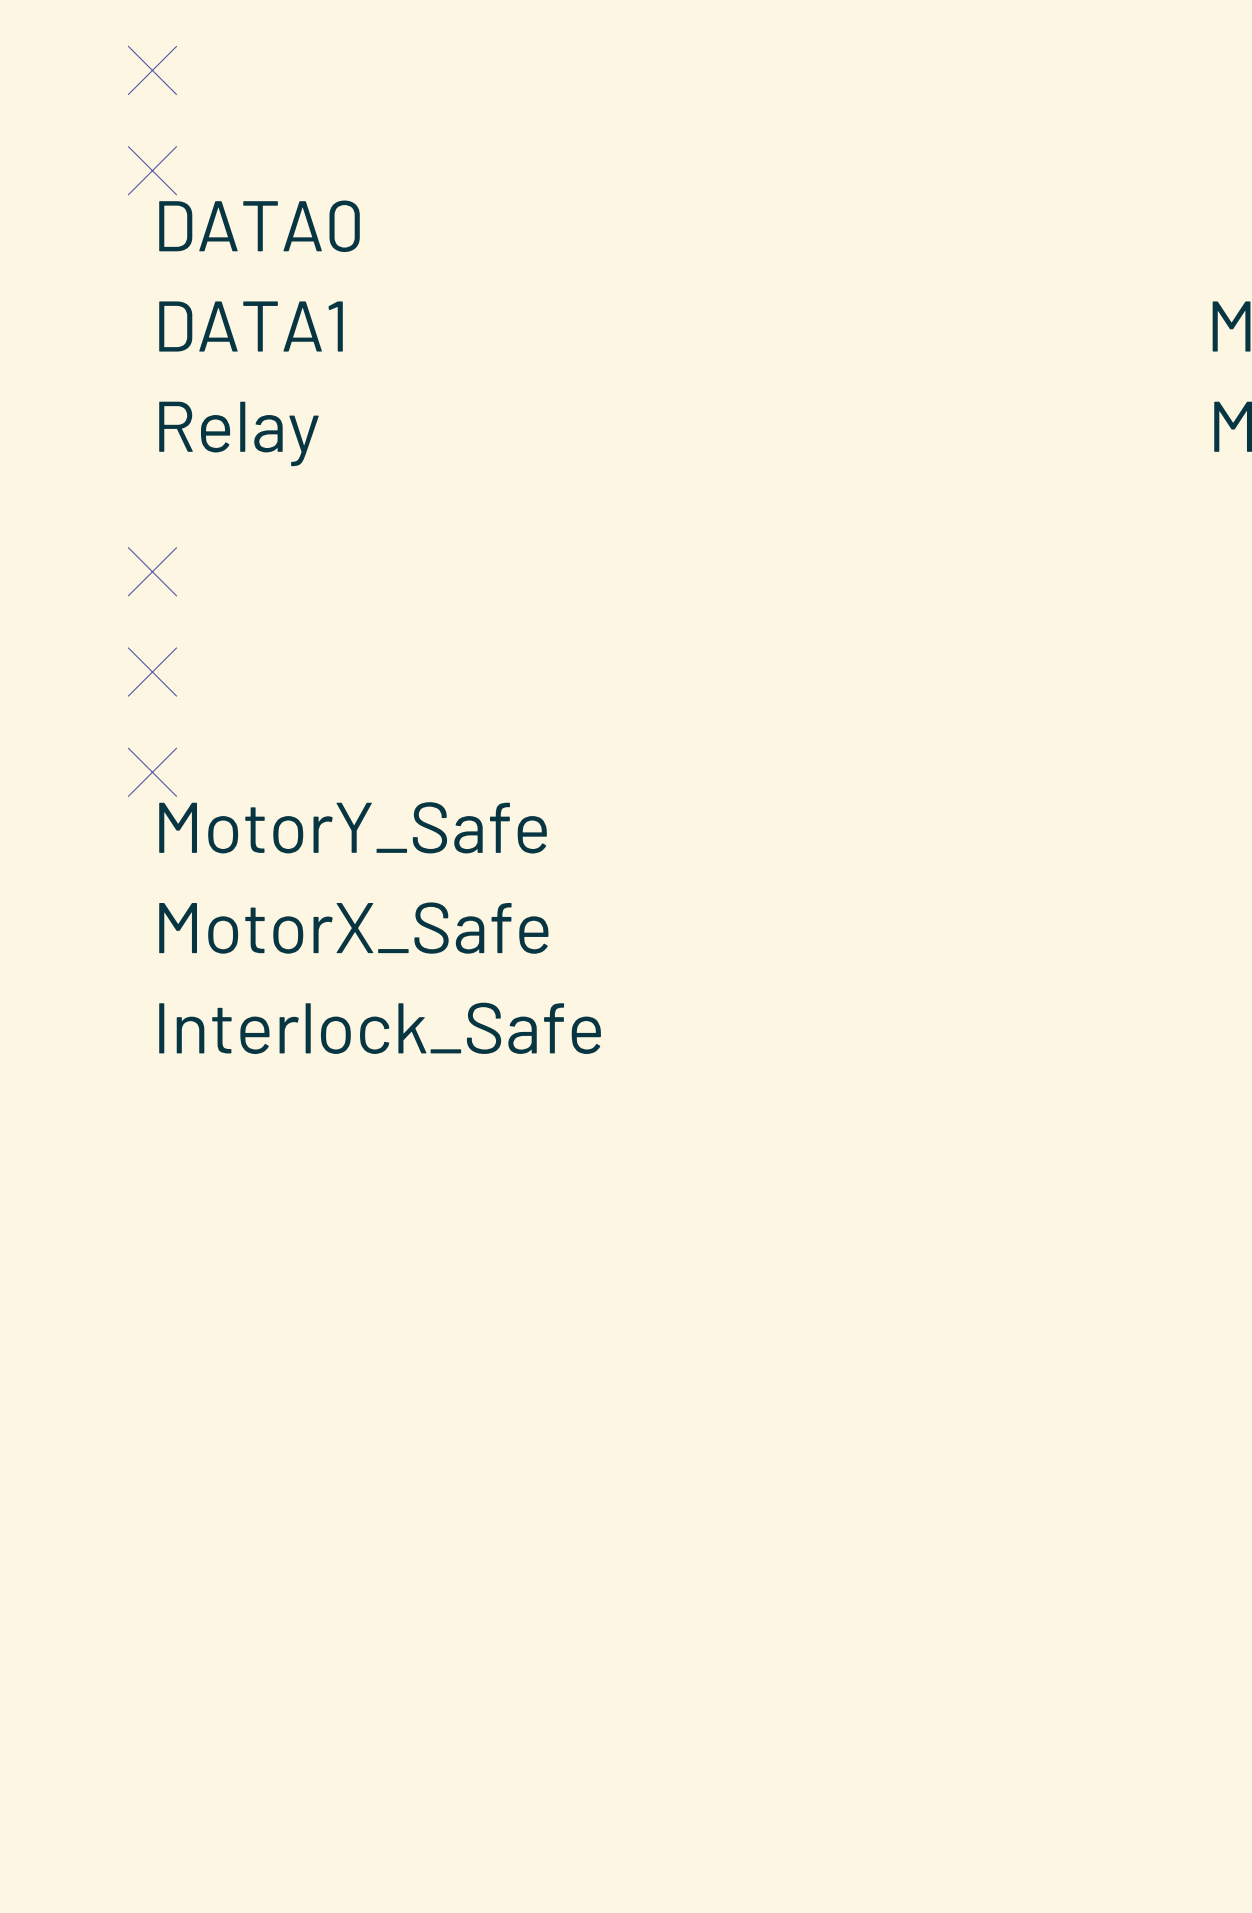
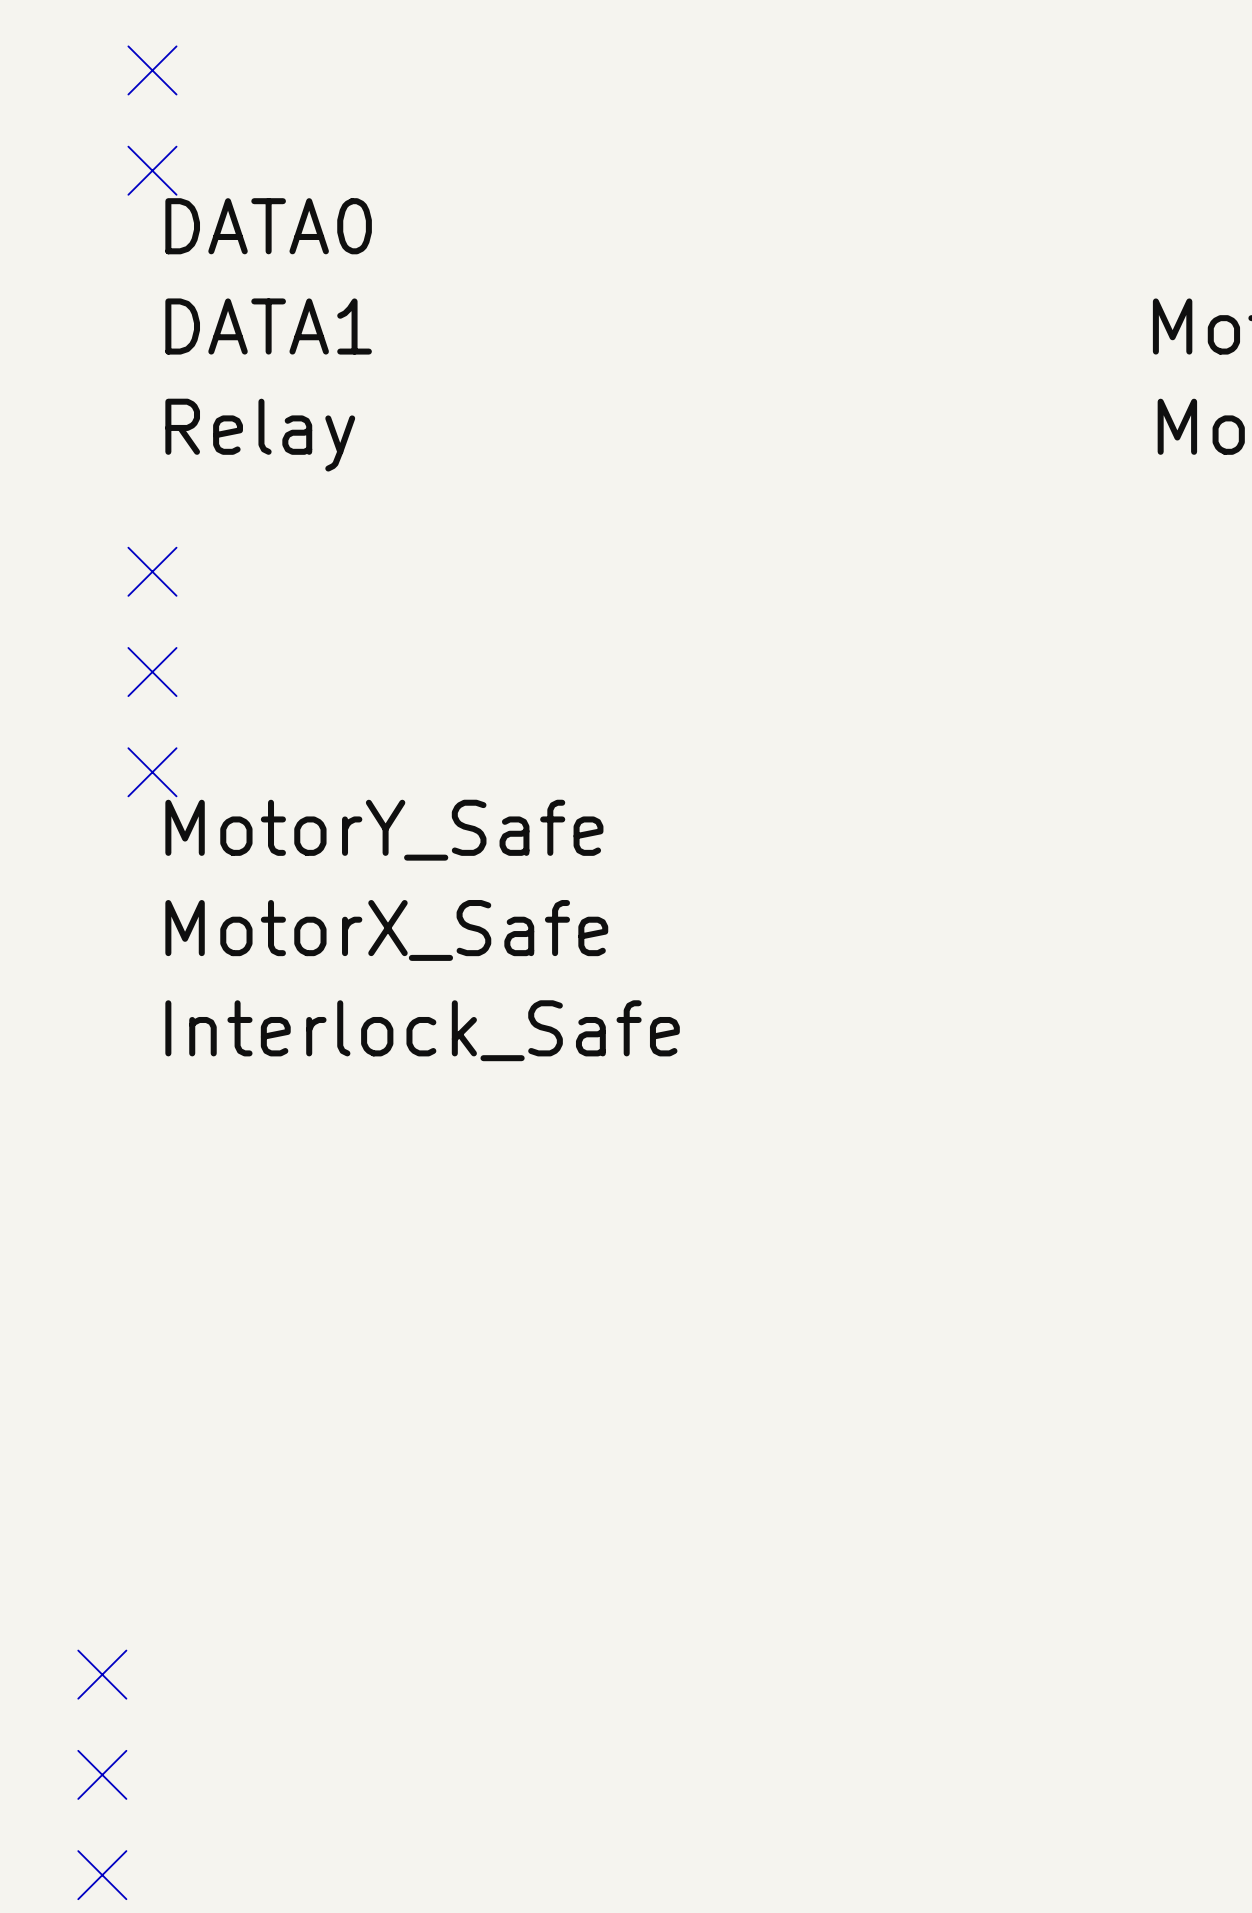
no-connect mark: none -> (102, 1674)
no-connect mark: none -> (102, 1774)
no-connect mark: none -> (102, 1875)

